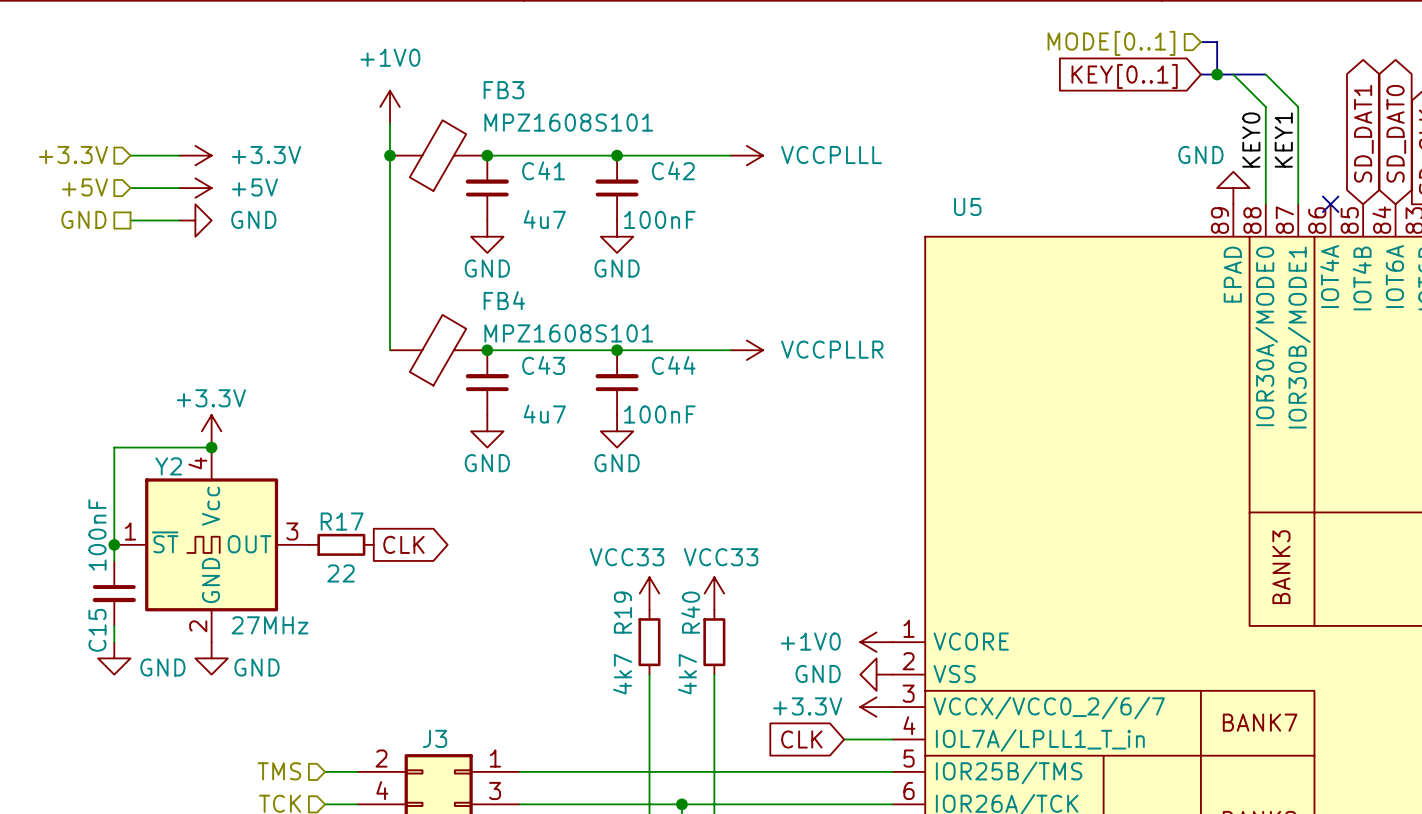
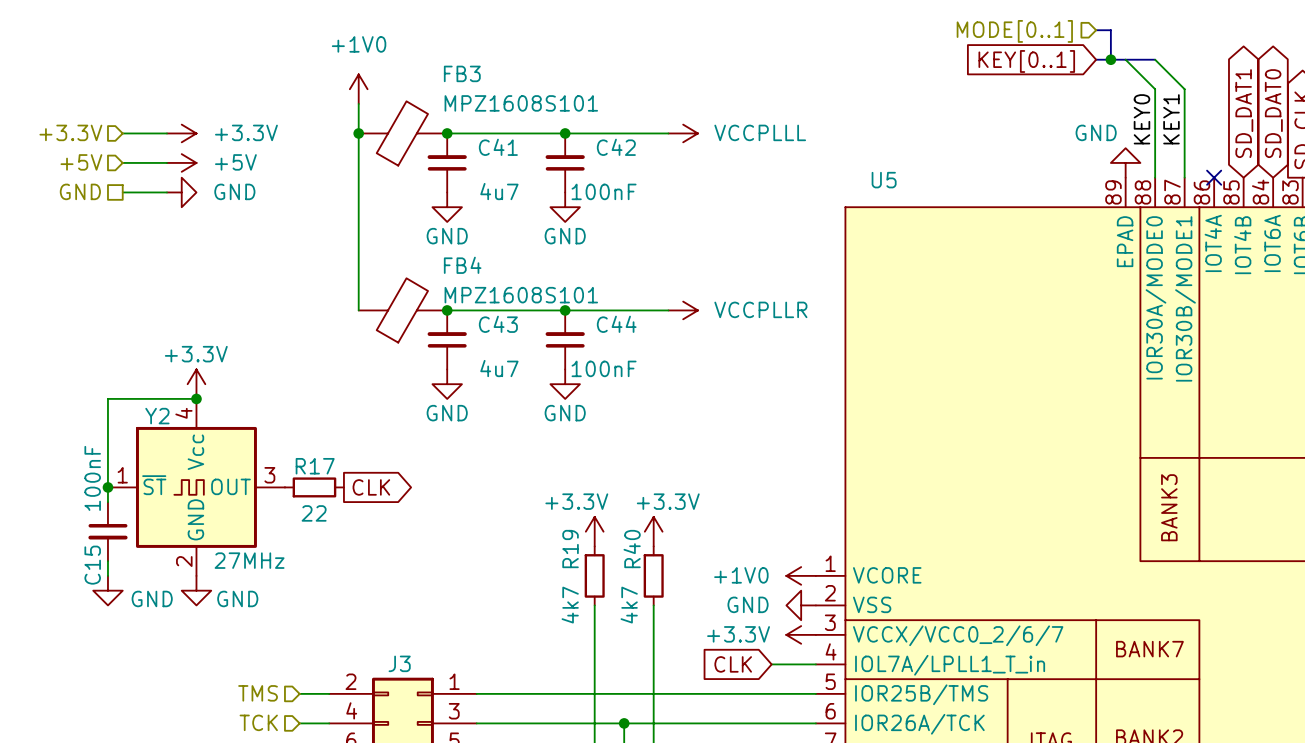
power symbol: VCC33 (649, 593) -> +3.3V (594, 531)
power symbol: VCC33 (714, 593) -> +3.3V (653, 531)

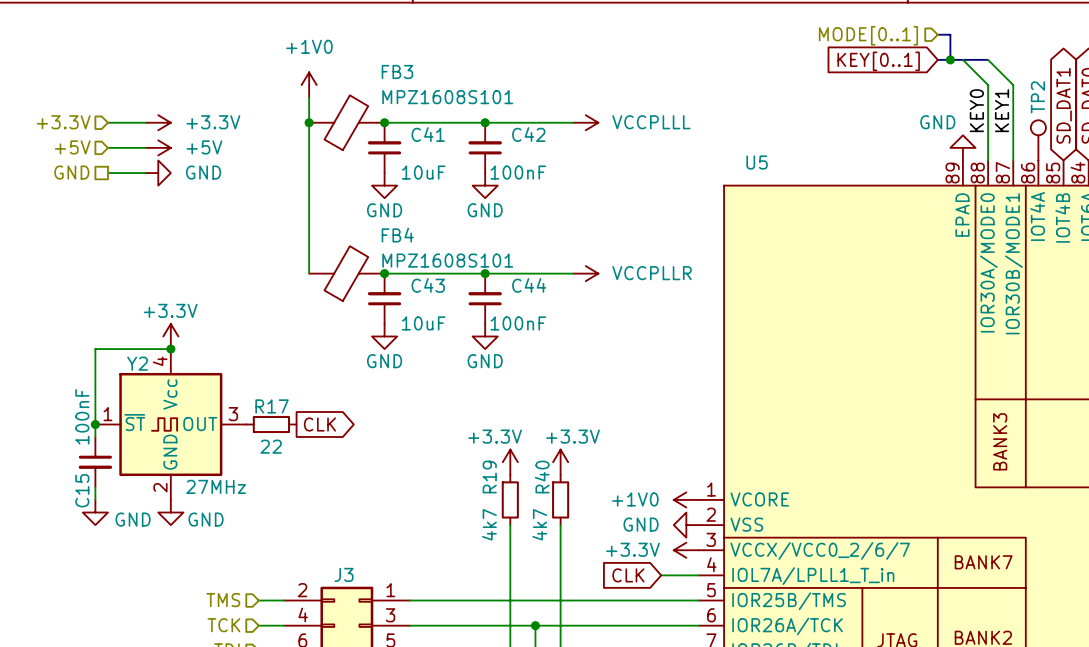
TP2: none -> (1038, 140)
no-connect mark: (1214, 177) -> none
C41 value: 4u7 (499, 191) -> 10uF (423, 172)
C43 value: 4u7 (499, 368) -> 10uF (423, 323)

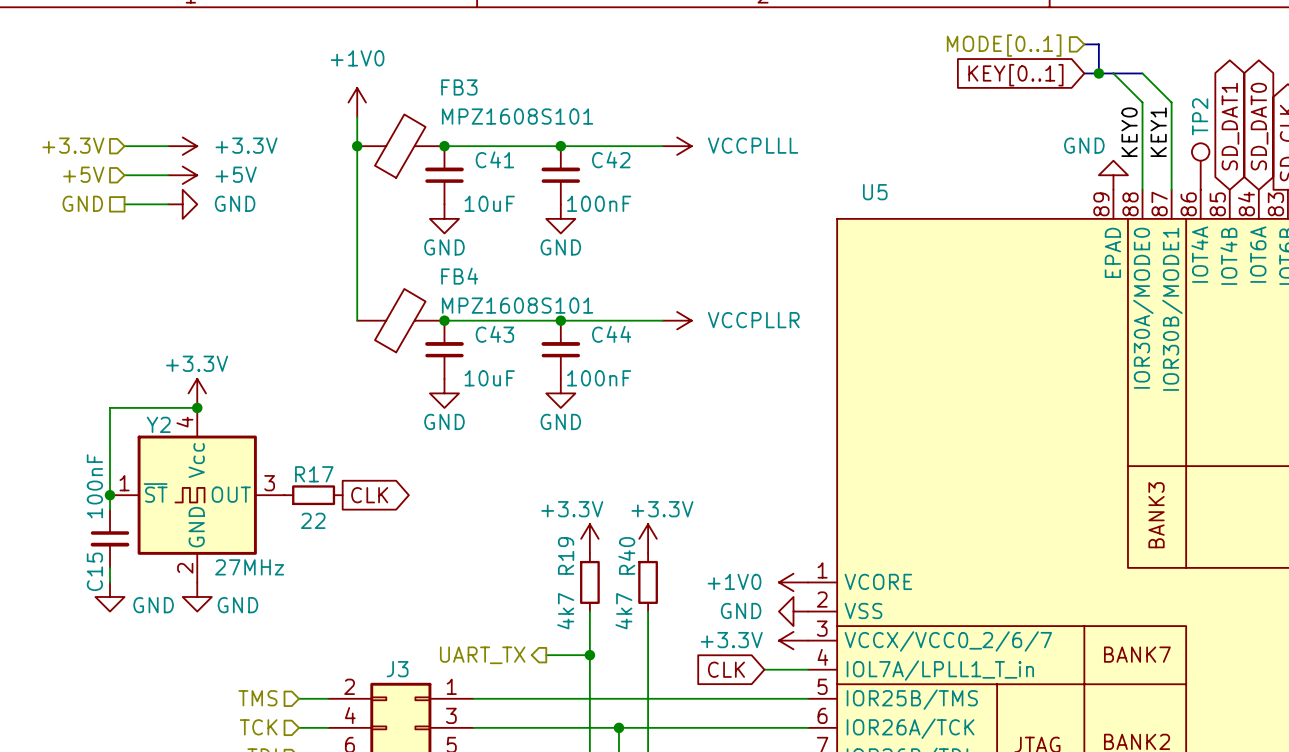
hierarchical label: none -> UART_TX (482, 655)
wire: none -> (546, 655) (589, 655)
junction: none -> (589, 655)

